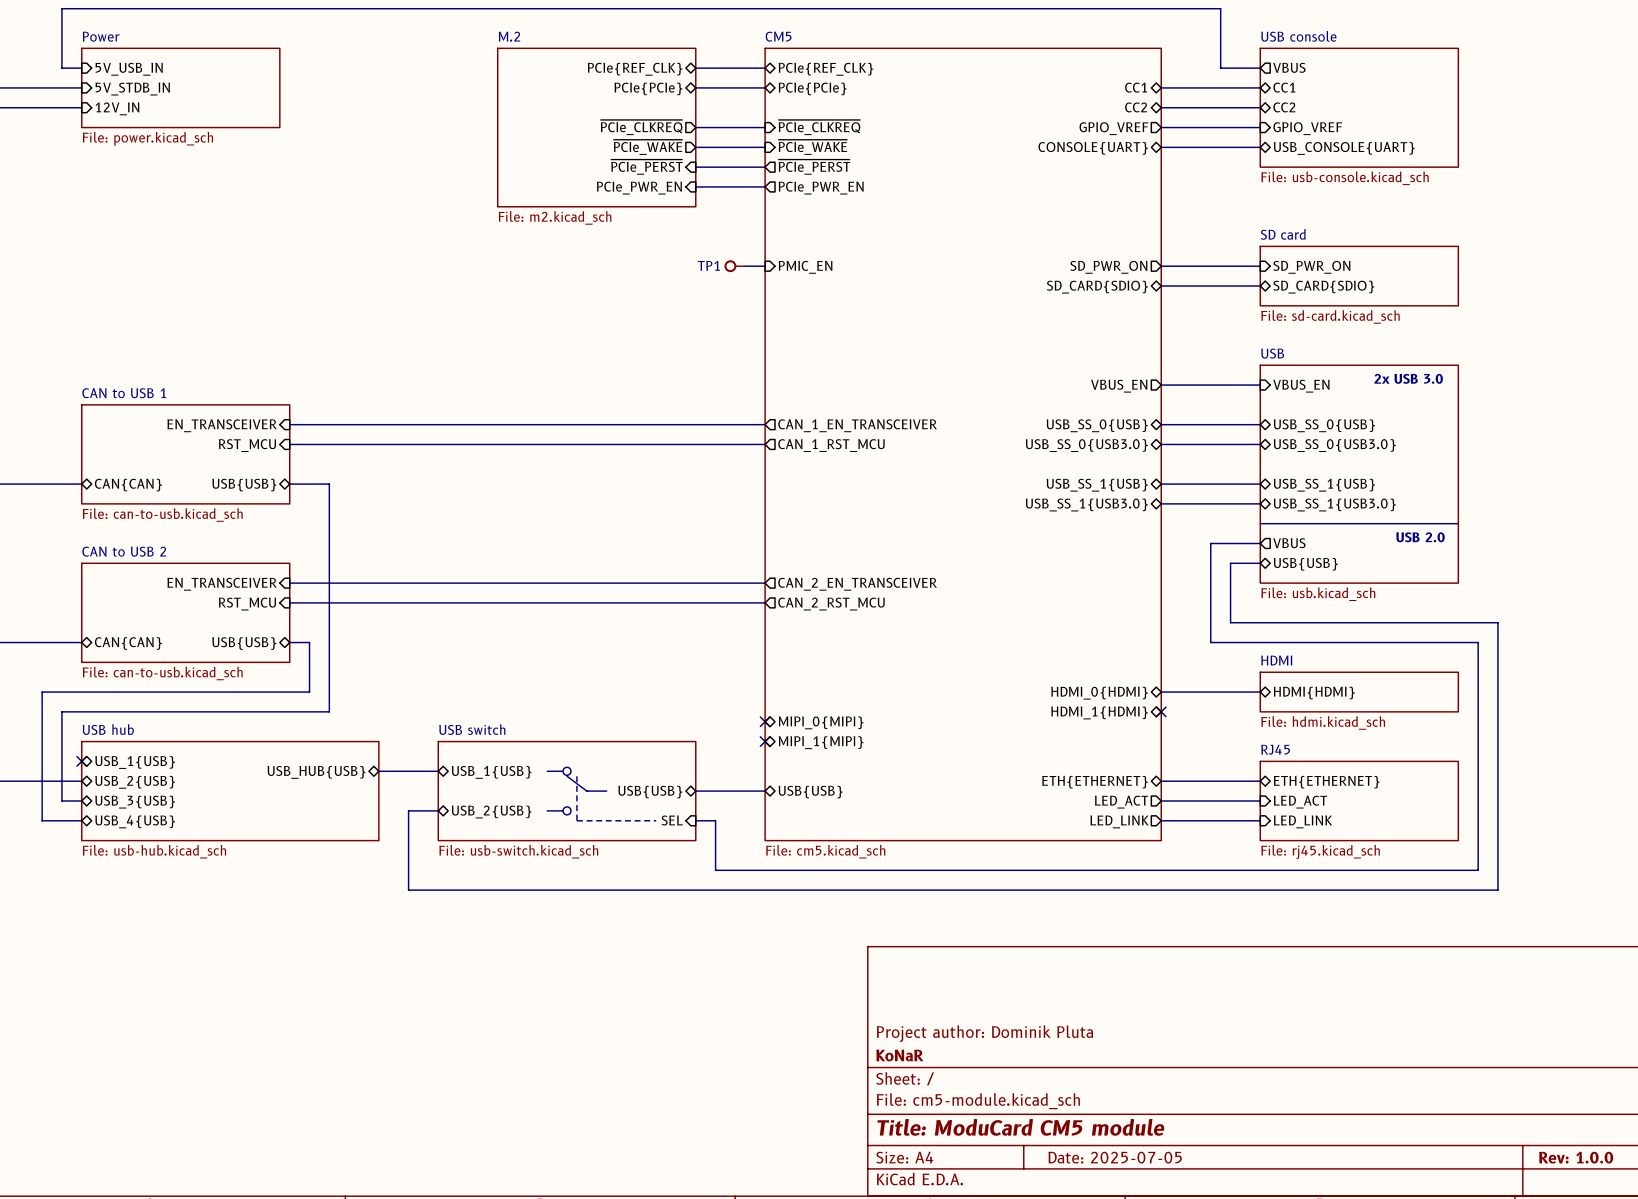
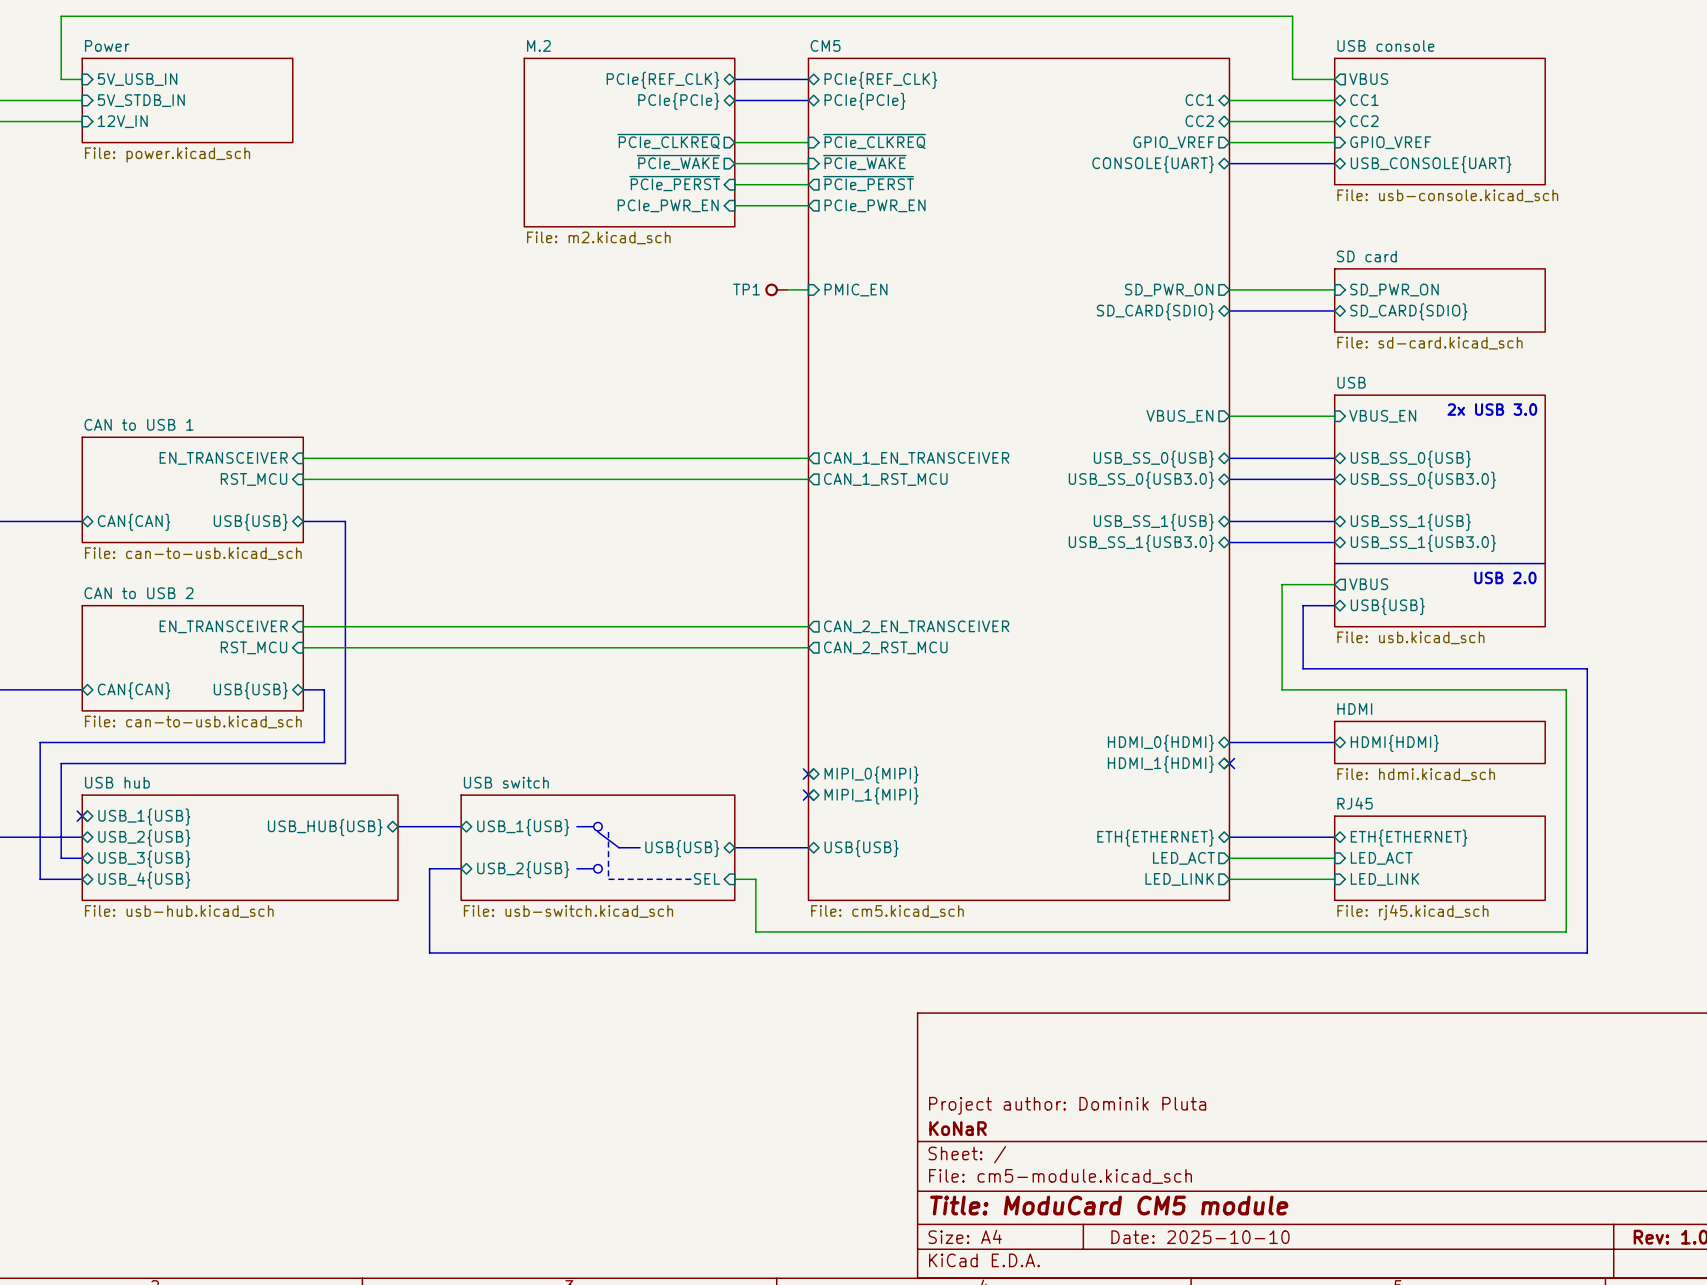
title block: Date: 2025-07-05 (1115, 1157) -> Date: 2025-10-10 (1200, 1237)

